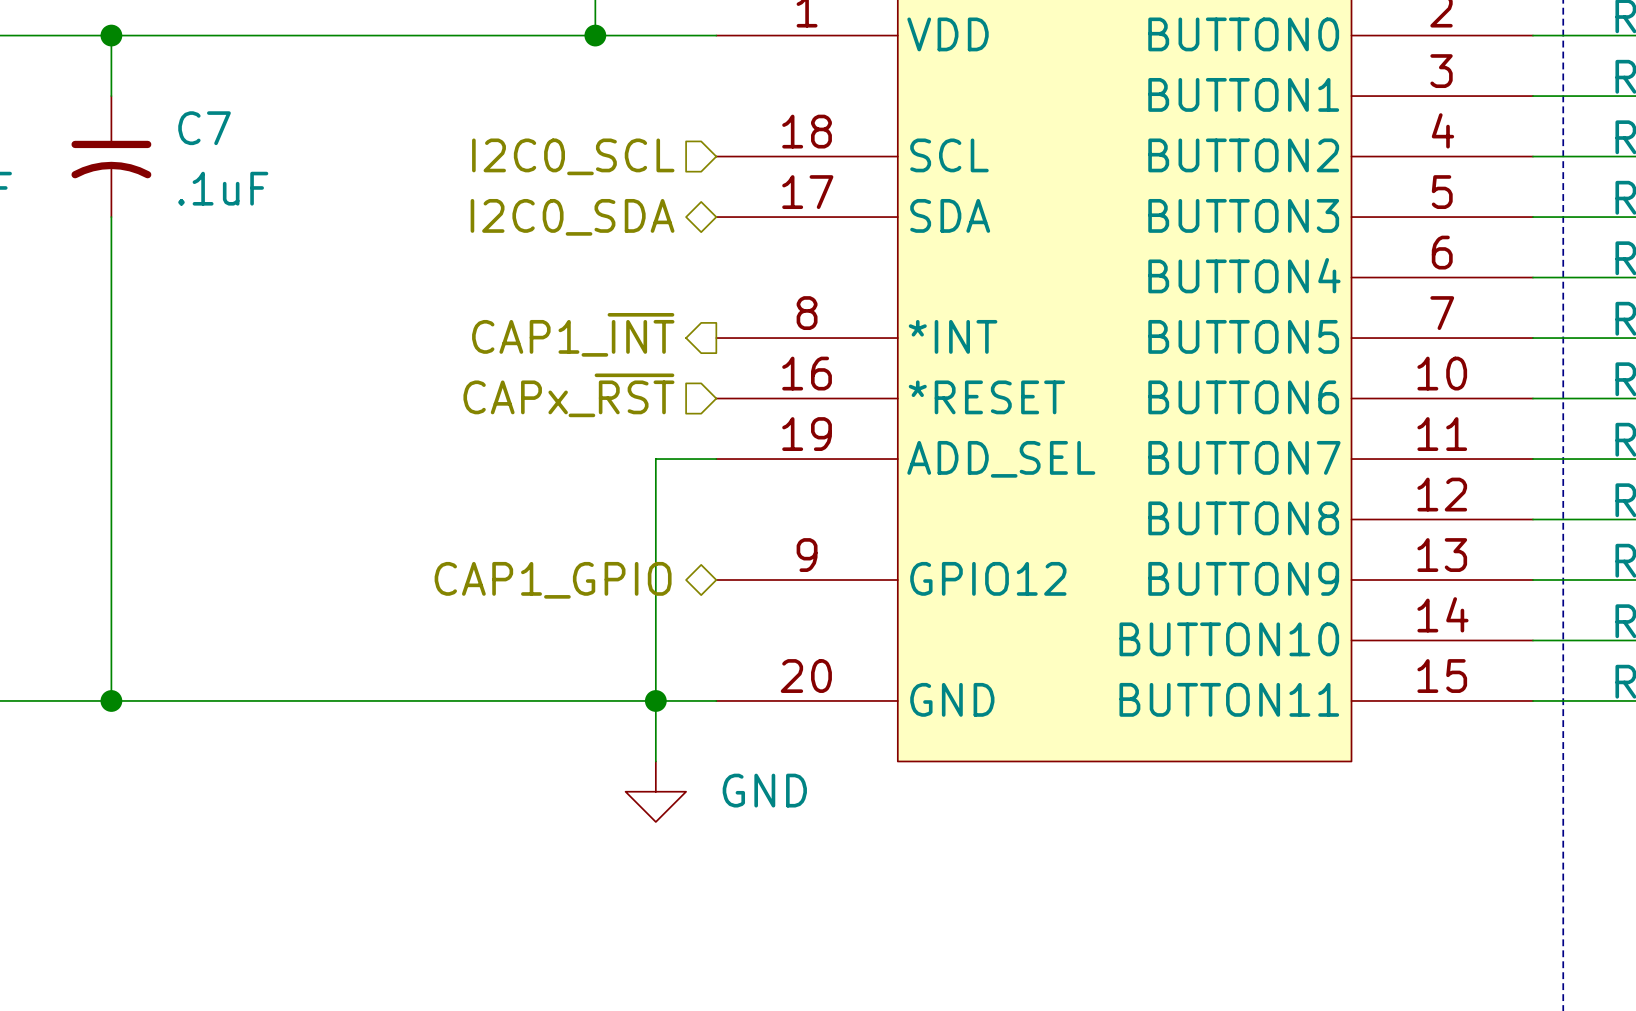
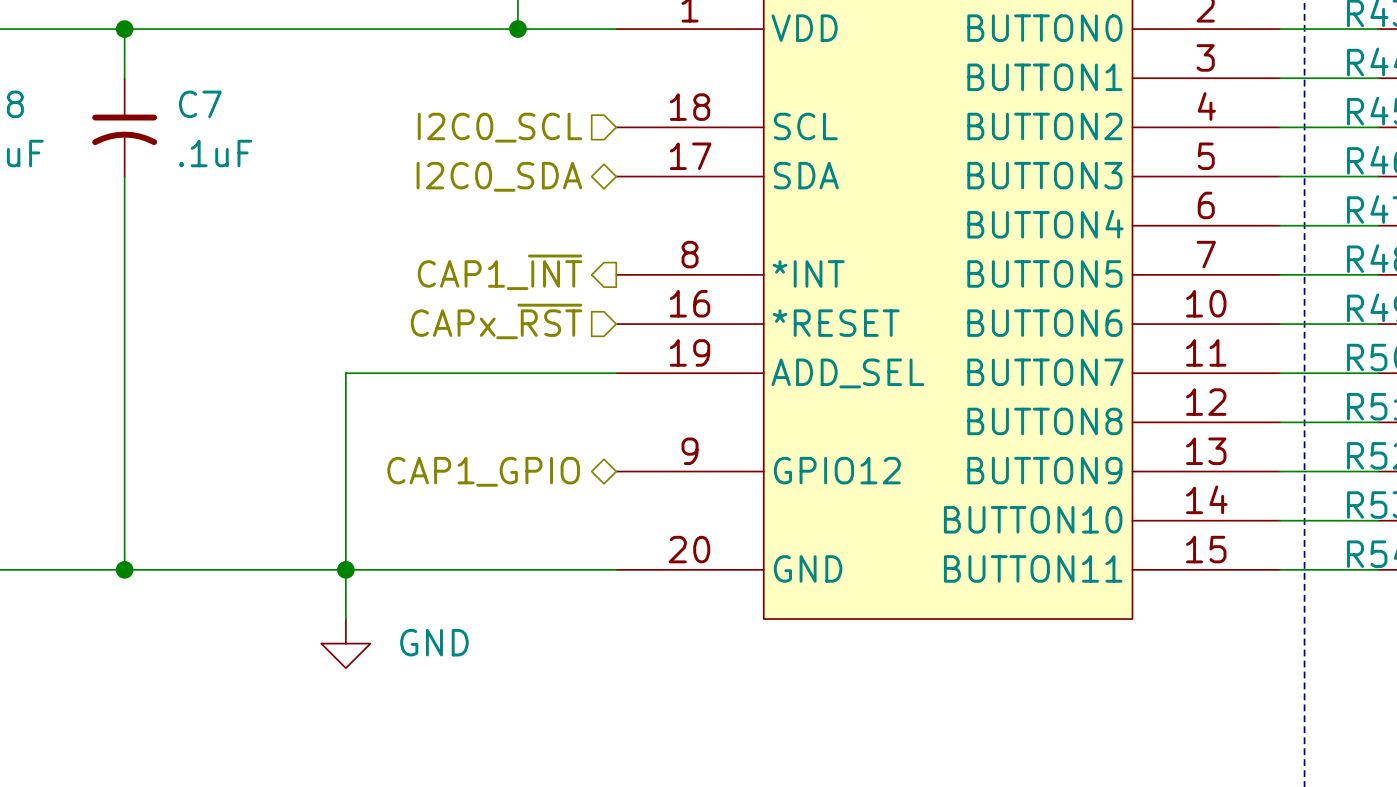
wire: (655, 459) (655, 761) -> (567, 373) (345, 373) (345, 619)
junction: none -> (345, 569)
junction: (655, 700) -> none
power symbol position: GND (655, 791) -> GND (345, 643)

